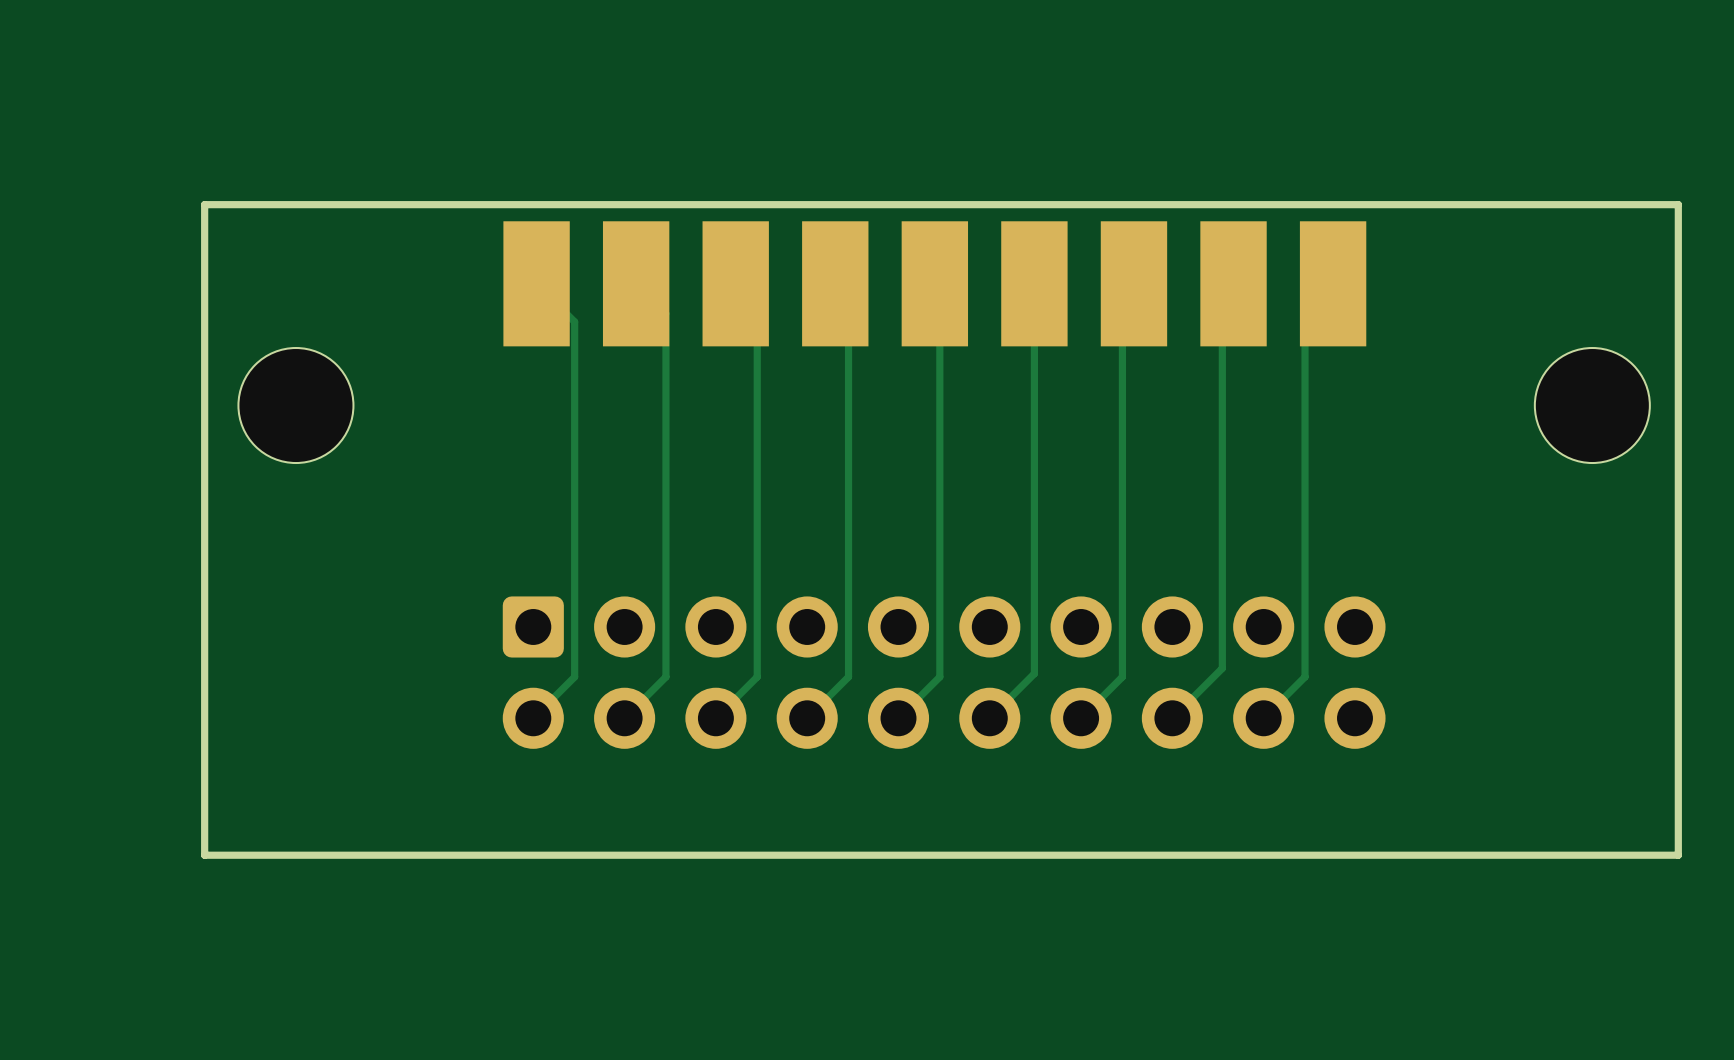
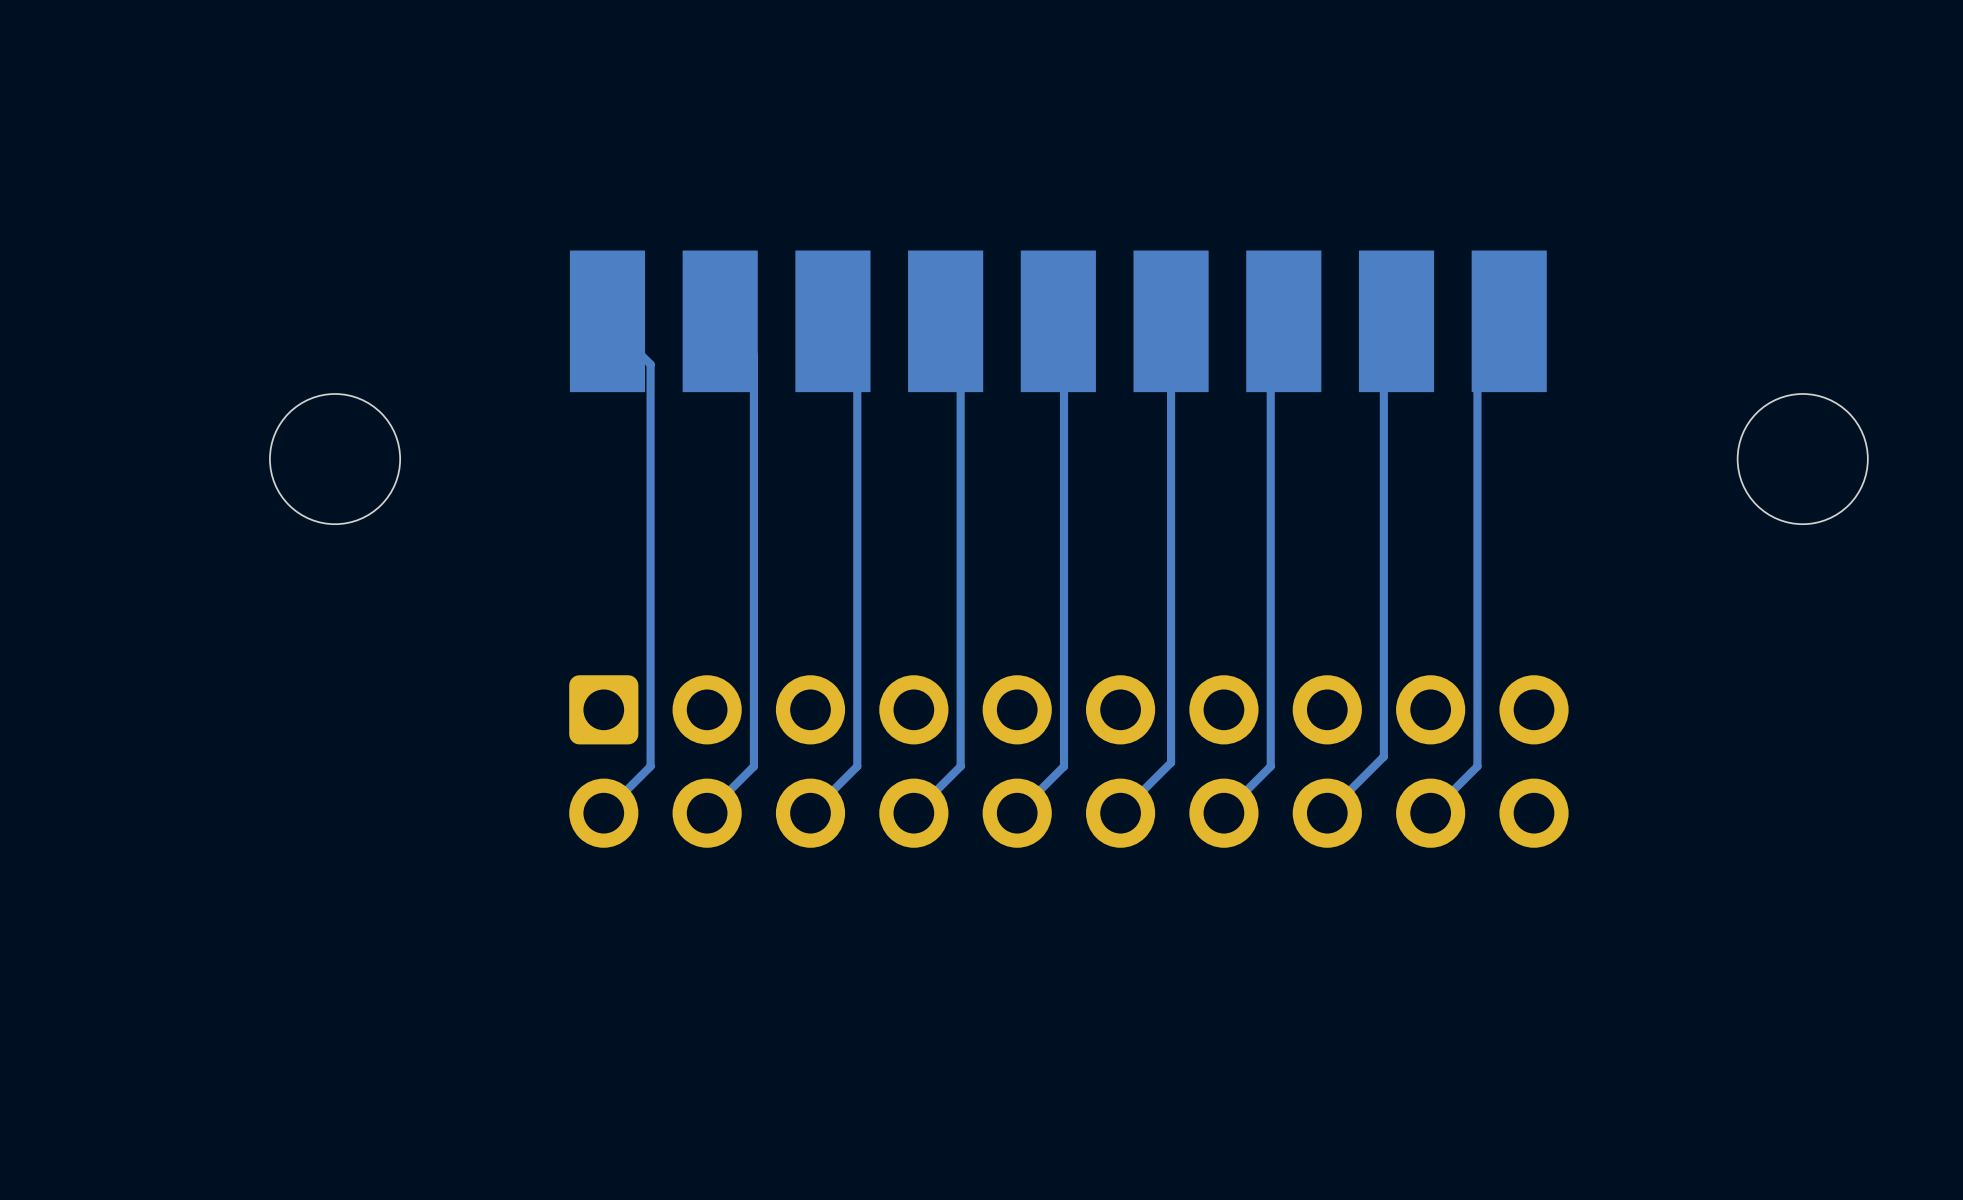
board edge: (1678, 204) (204, 204) (204, 855) (1678, 855) (1678, 204) -> none

